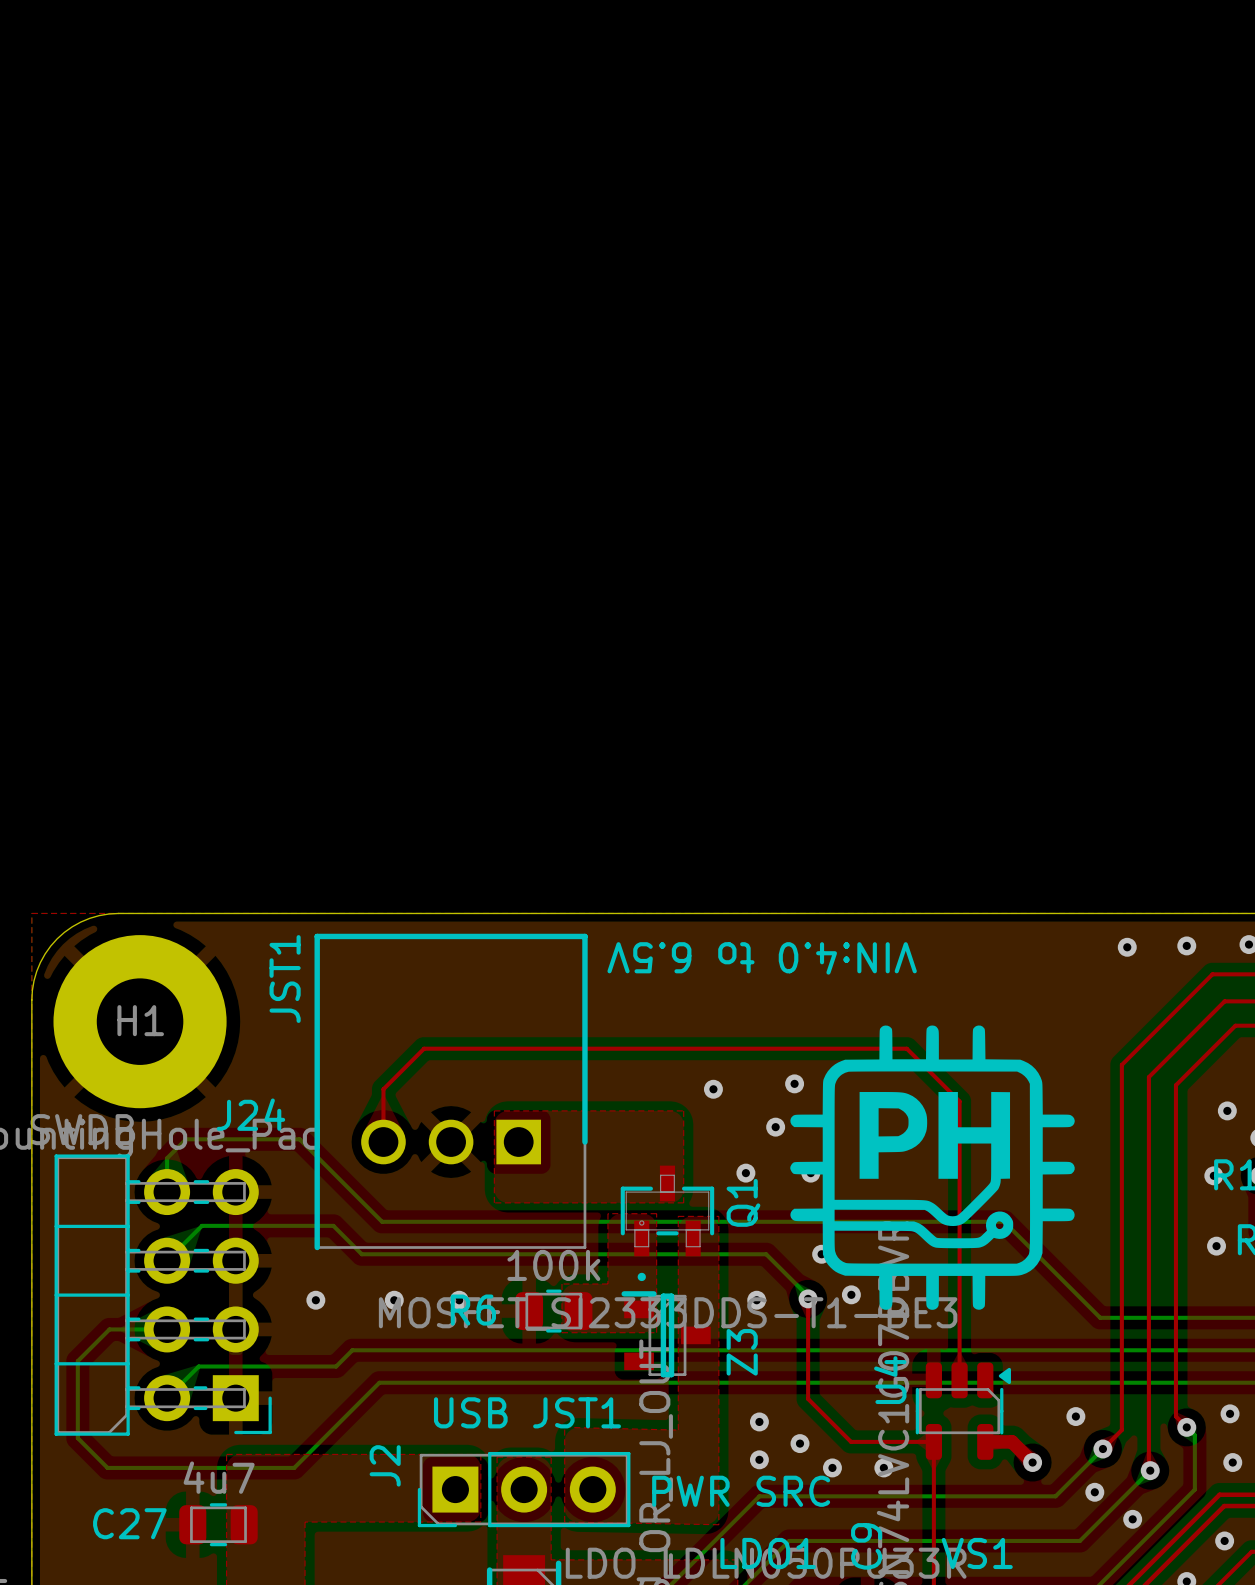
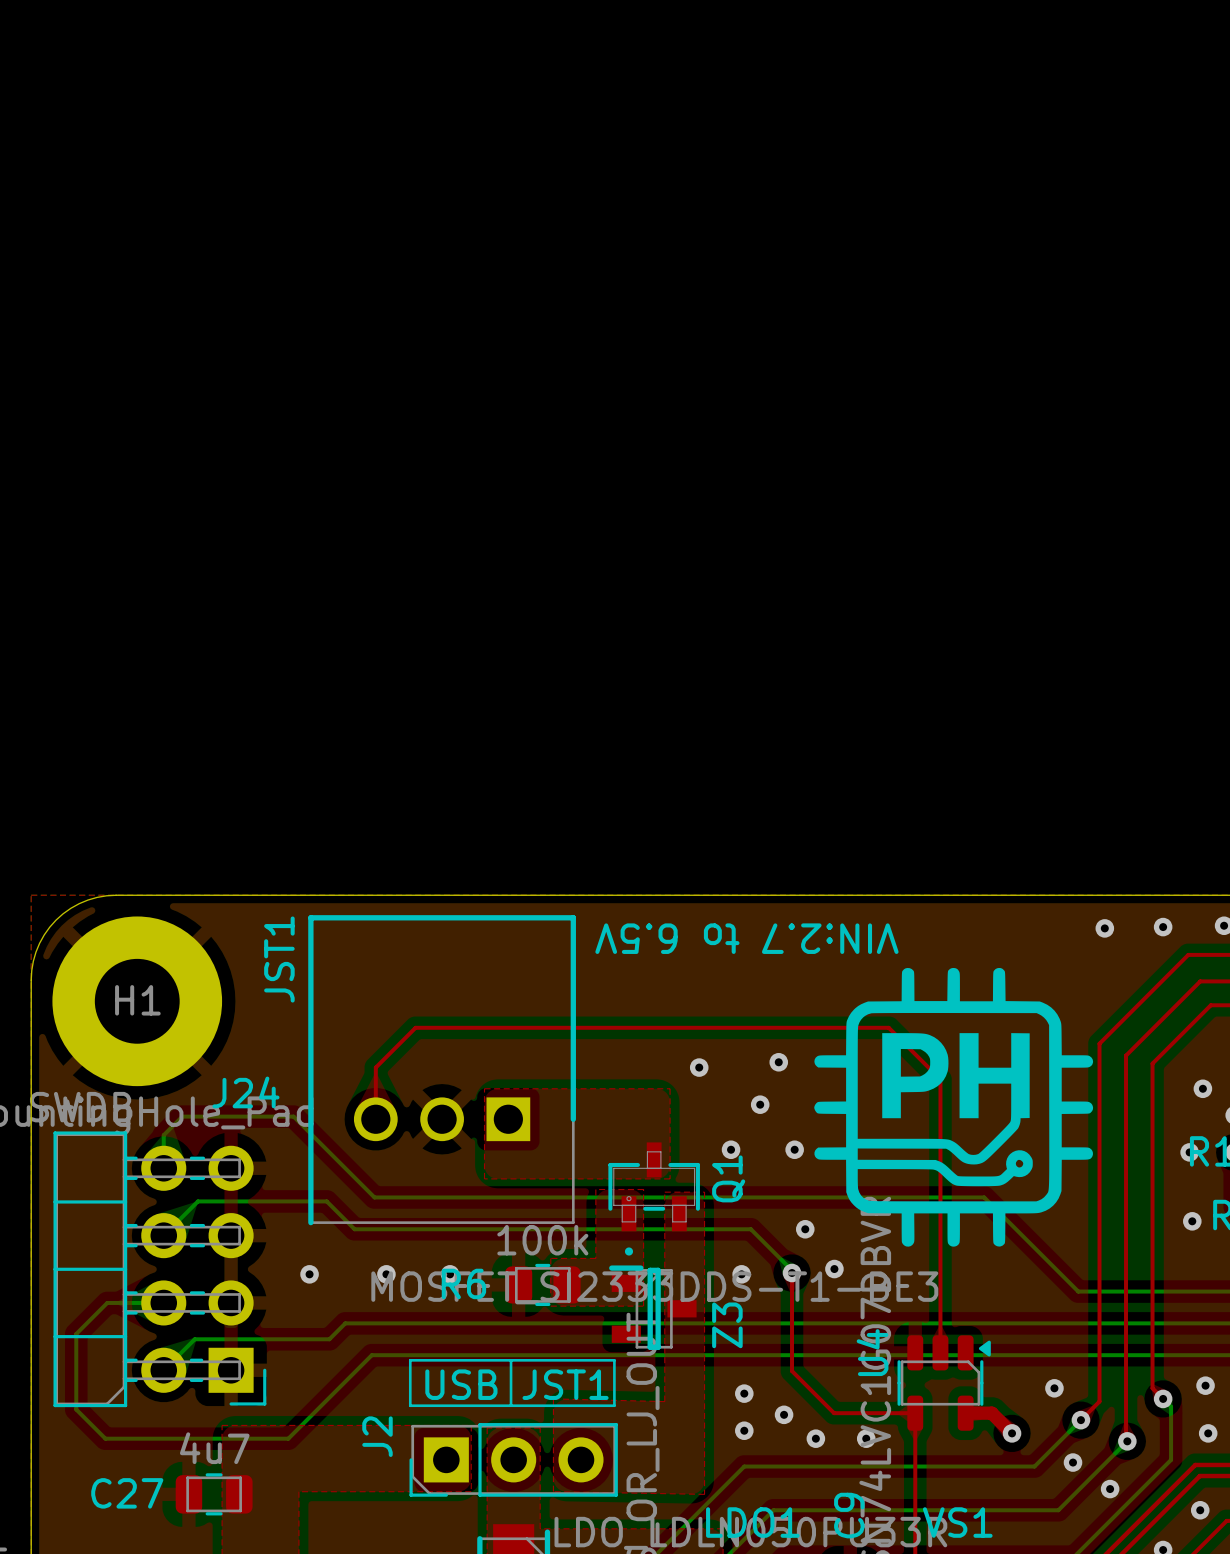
text: VIN:4.0 to 6.5V (762, 958) -> VIN:2.7 to 6.5V (746, 938)
drawing position: (932, 1167) -> (953, 1107)
line: none -> (410, 1360) (410, 1405) (614, 1405) (614, 1360) (410, 1360)
line: none -> (511, 1360) (511, 1405)
text: PWR SRC (741, 1491) -> none

